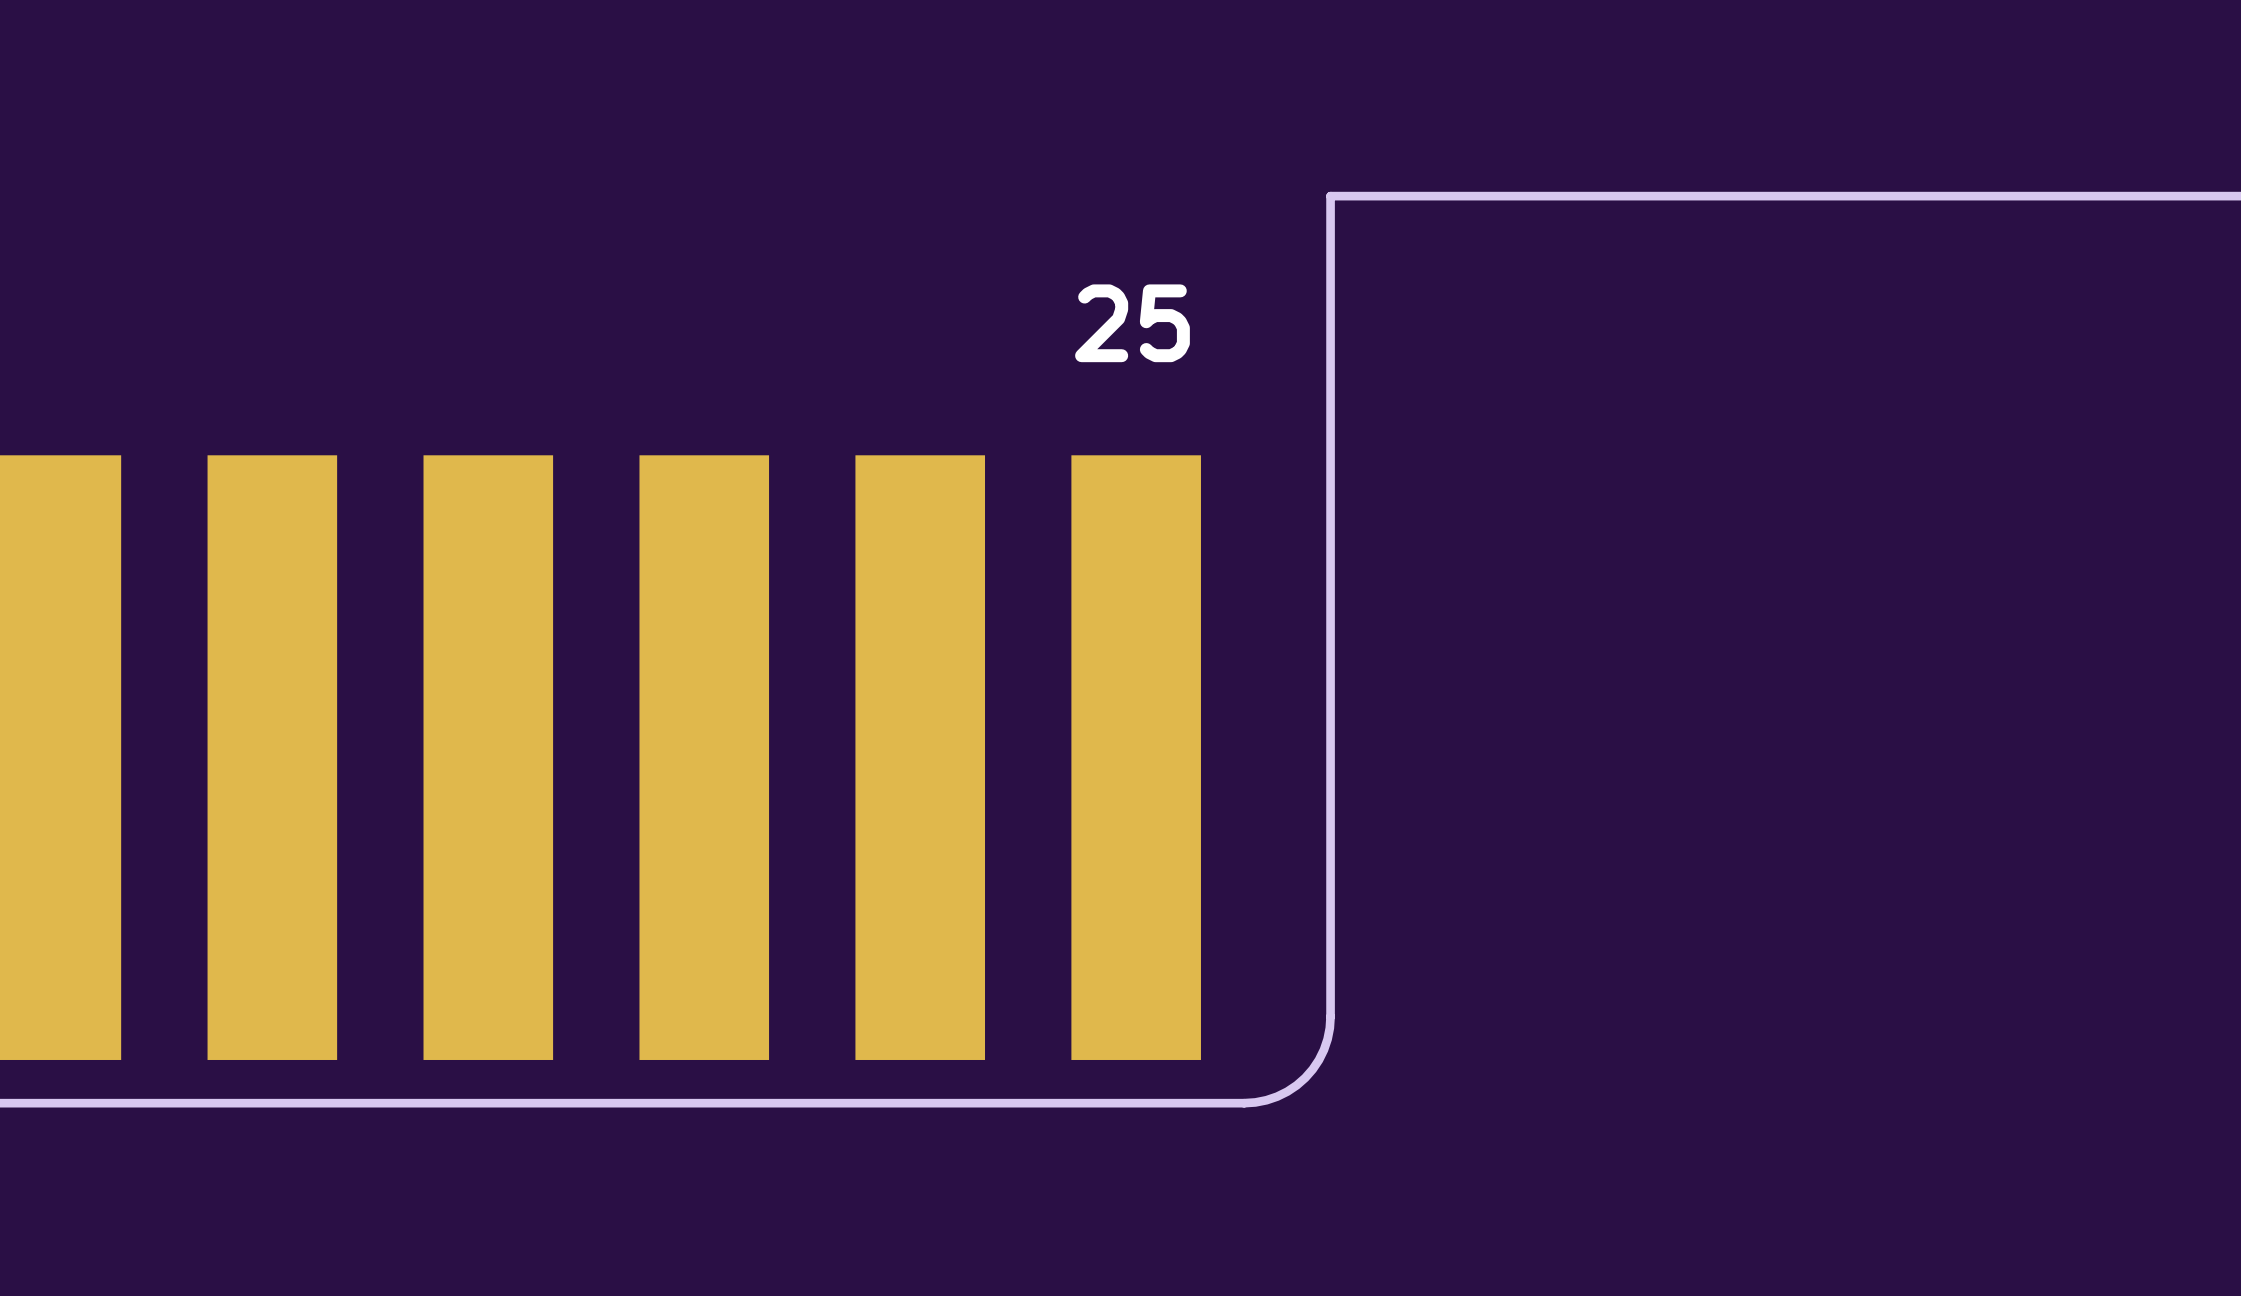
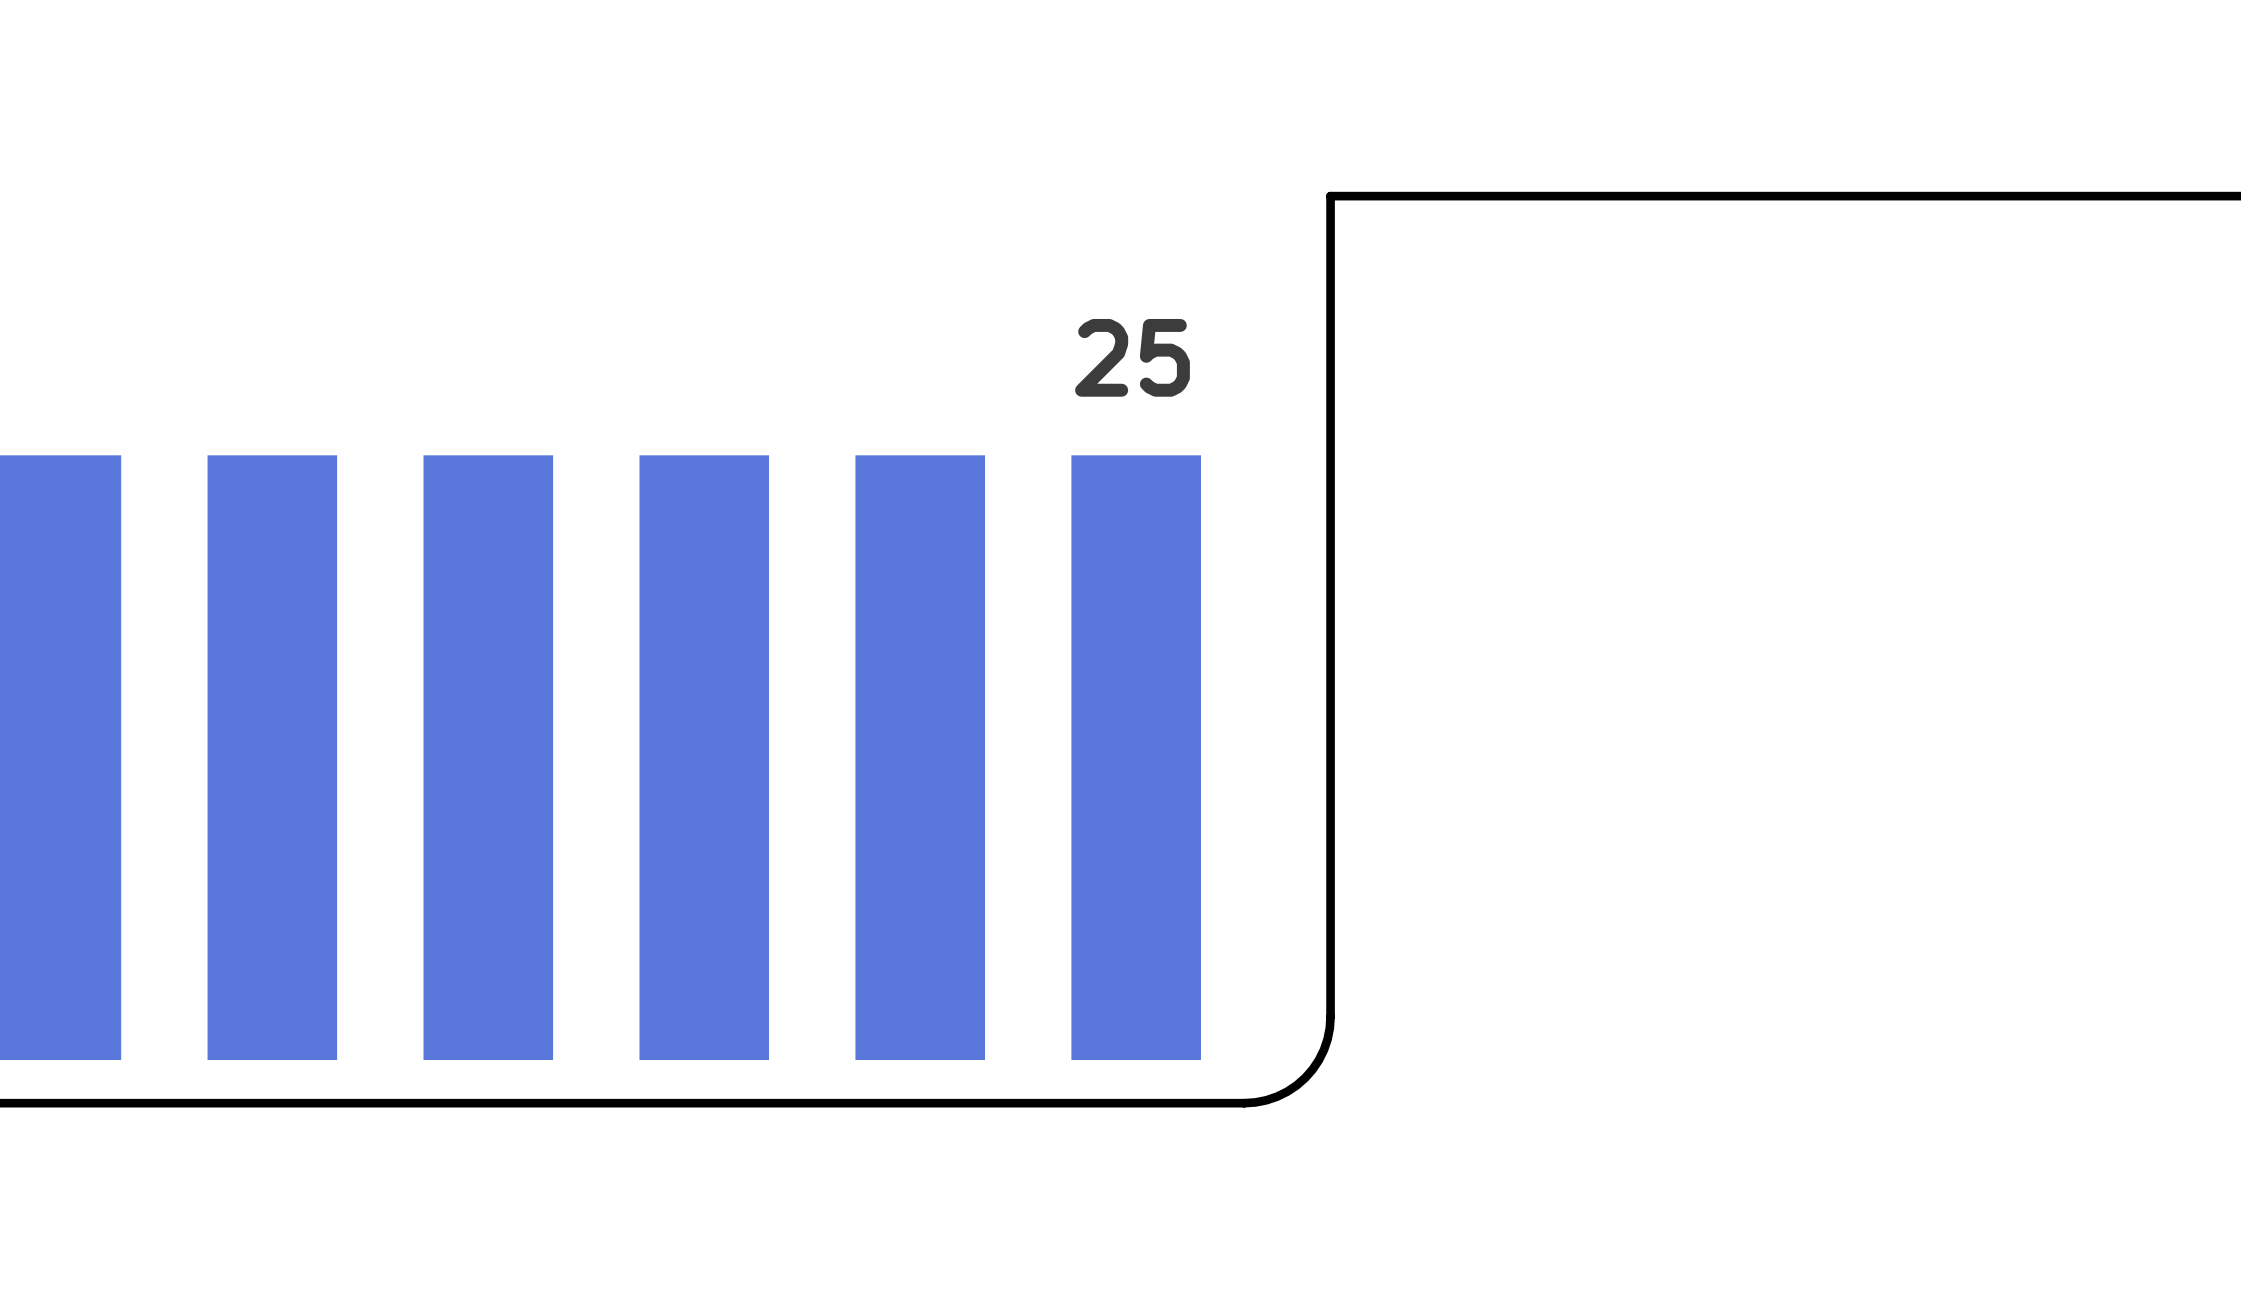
text position: 25 (1132, 323) -> 25 (1132, 357)

